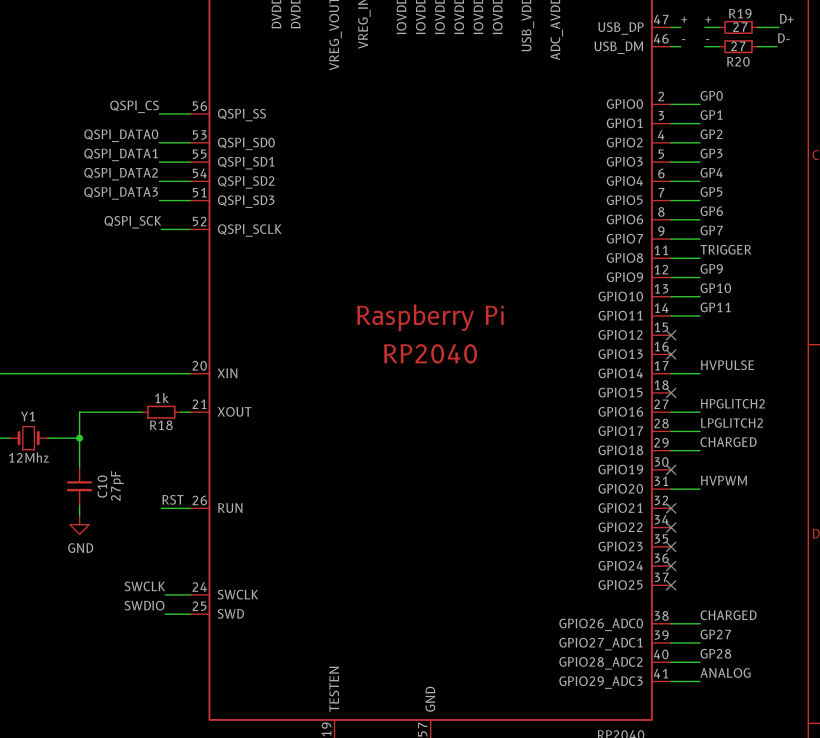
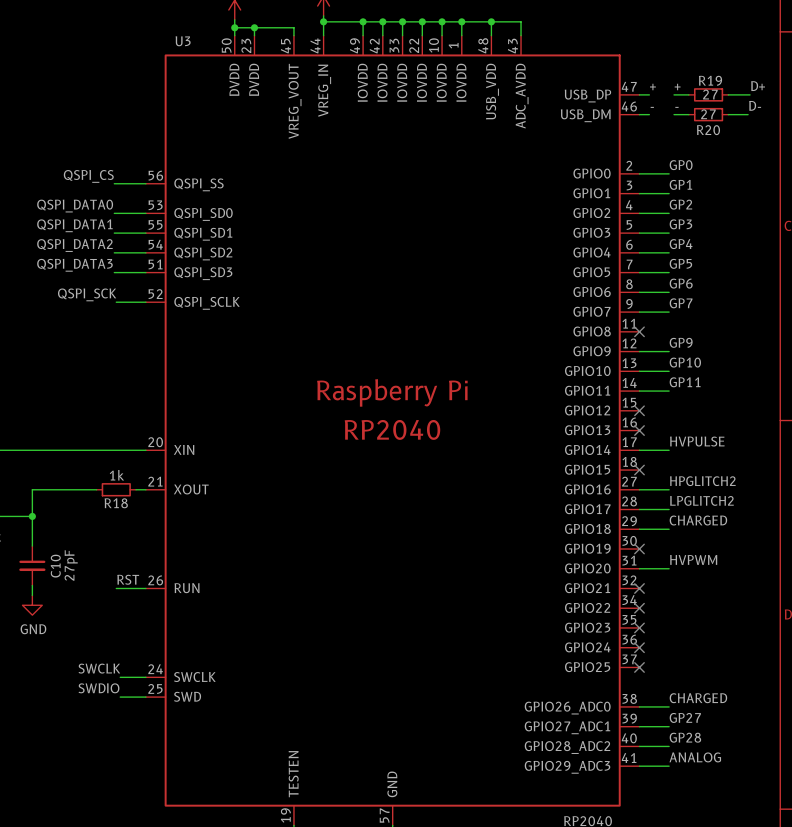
label: TRIGGER (725, 249) -> none
wire: (671, 258) (700, 258) -> none
no-connect mark: none -> (639, 331)

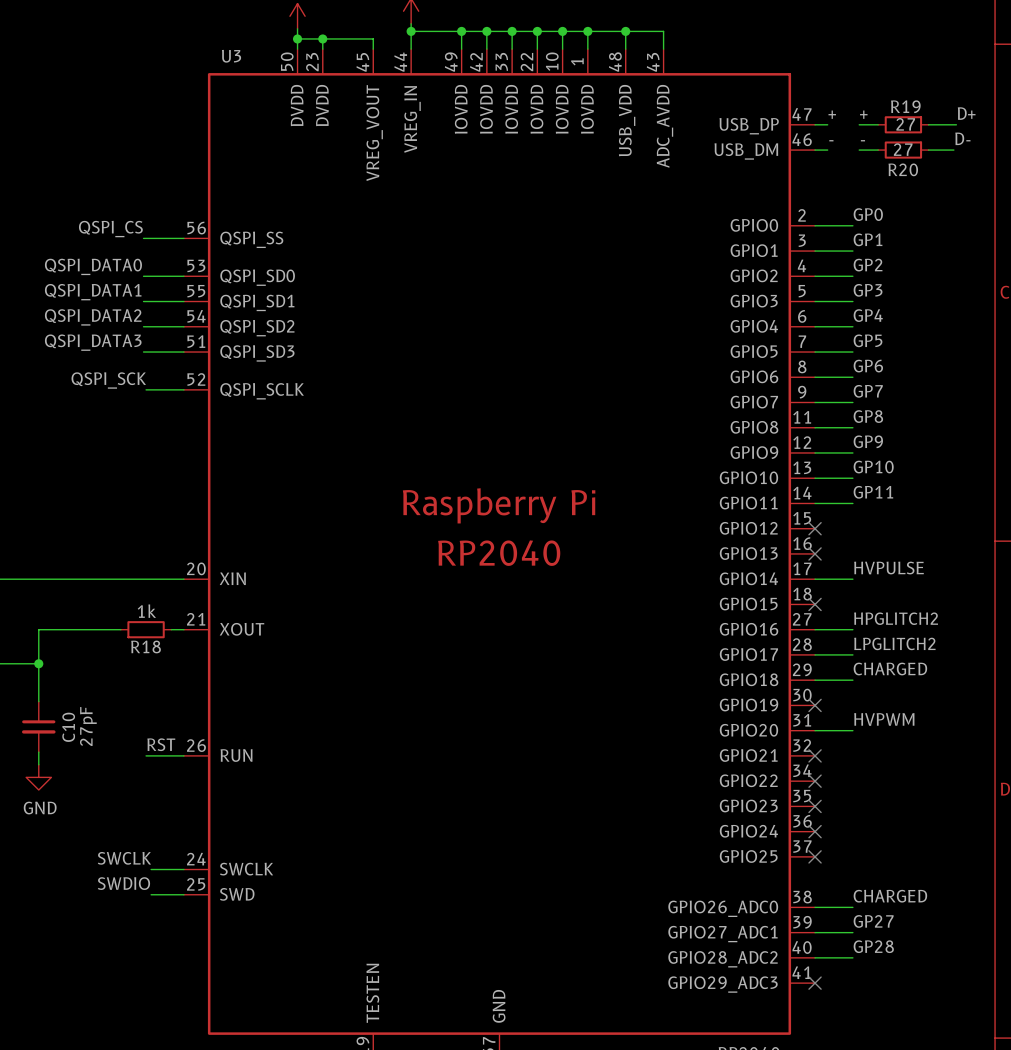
label: none -> GP8 (868, 416)
wire: none -> (815, 427) (852, 427)
no-connect mark: (639, 331) -> none
label: ANALOG (695, 757) -> none
wire: (639, 766) (669, 766) -> none
no-connect mark: none -> (815, 983)

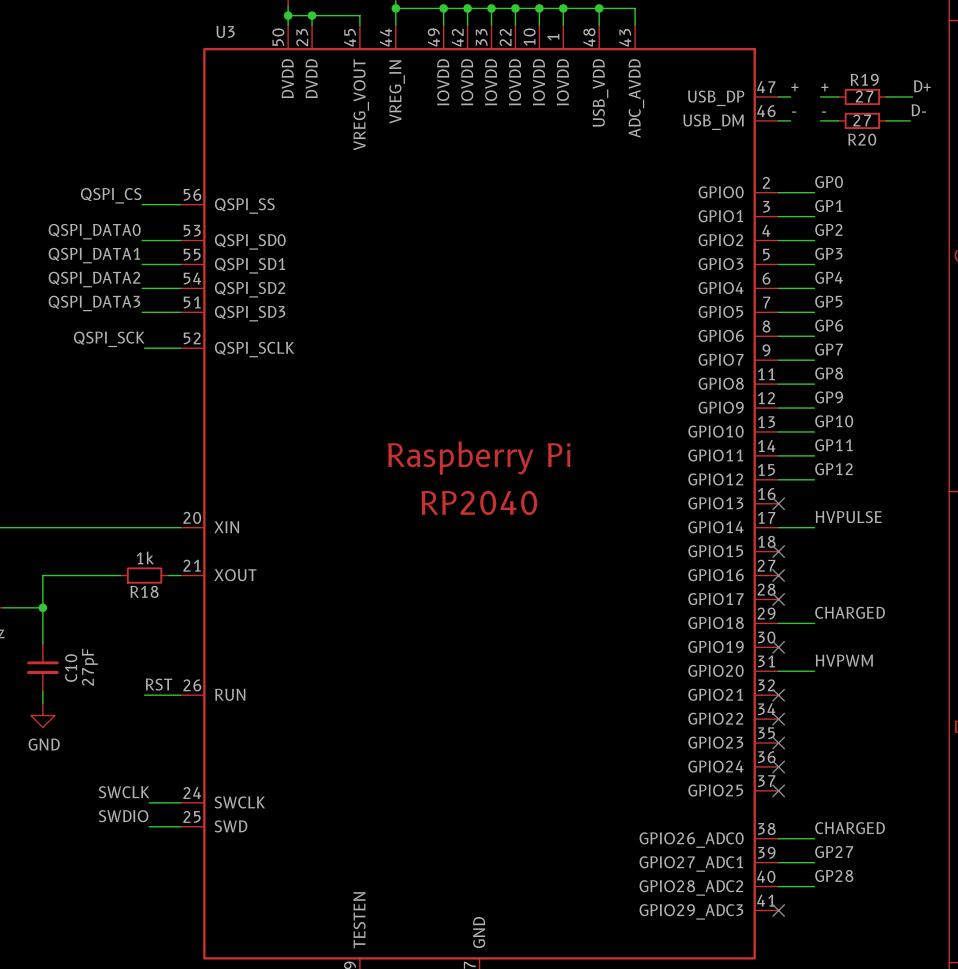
label: none -> GP12 (833, 469)
no-connect mark: (815, 528) -> none
label: HPGLITCH2 (896, 618) -> none
wire: (815, 629) (852, 629) -> (778, 479) (814, 479)
no-connect mark: none -> (778, 575)
label: LPGLITCH2 (894, 643) -> none
wire: (815, 654) (852, 654) -> none
no-connect mark: none -> (778, 599)

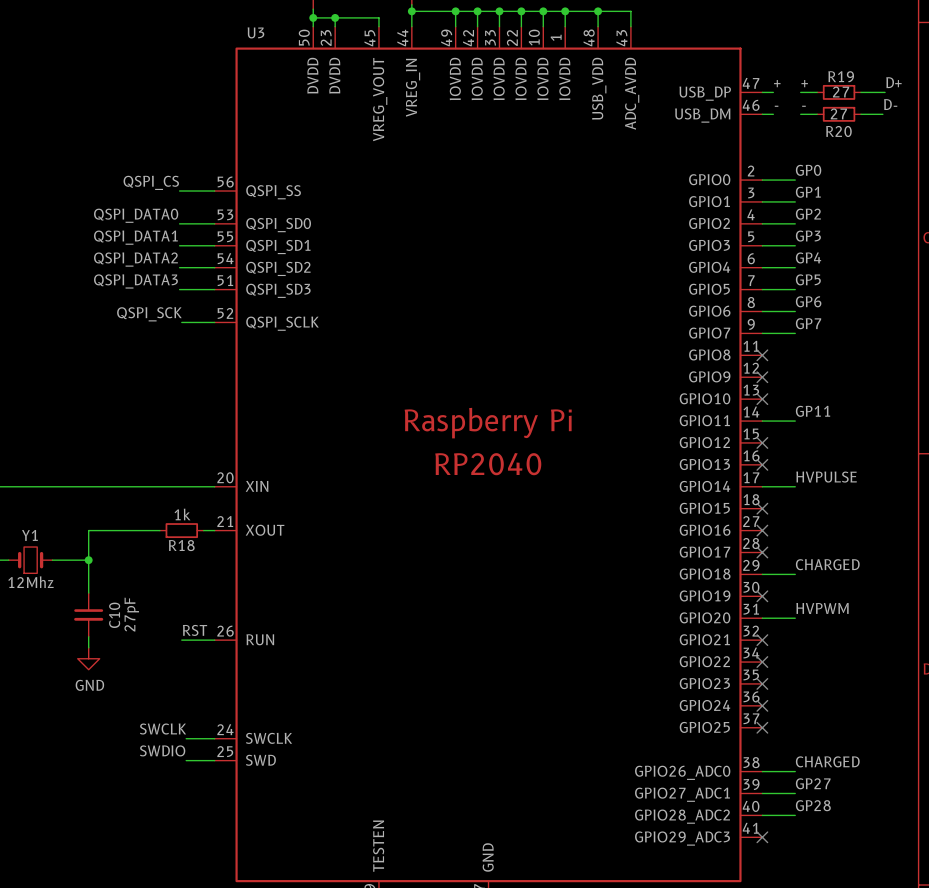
label: GP8 (829, 373) -> none
wire: (778, 384) (814, 384) -> none
no-connect mark: none -> (762, 355)
label: GP9 (829, 397) -> none
wire: (778, 408) (814, 408) -> none
no-connect mark: none -> (762, 377)
label: GP10 (834, 421) -> none
wire: (778, 431) (814, 431) -> none
no-connect mark: none -> (762, 399)
label: GP12 (833, 469) -> none
wire: (778, 479) (814, 479) -> none
no-connect mark: none -> (762, 442)

